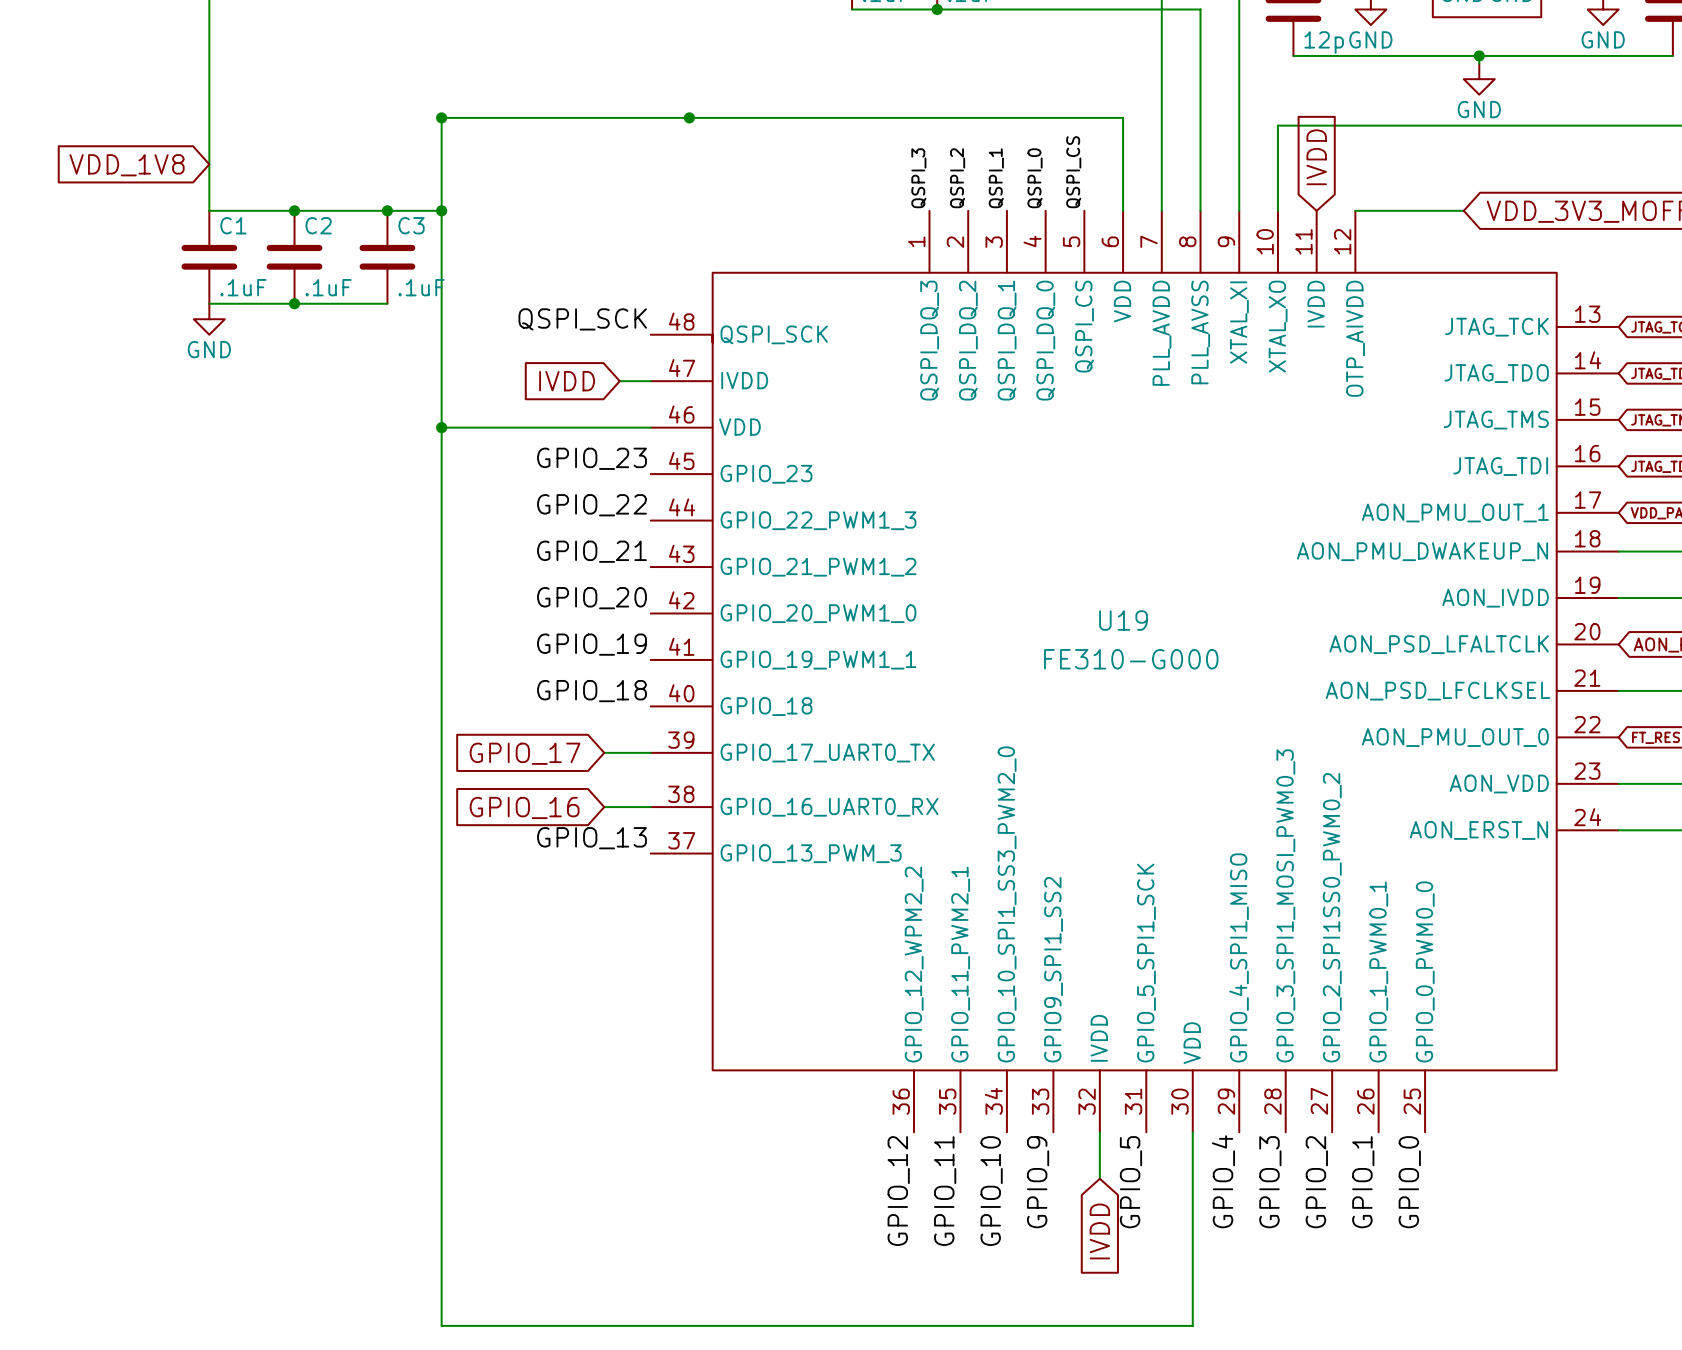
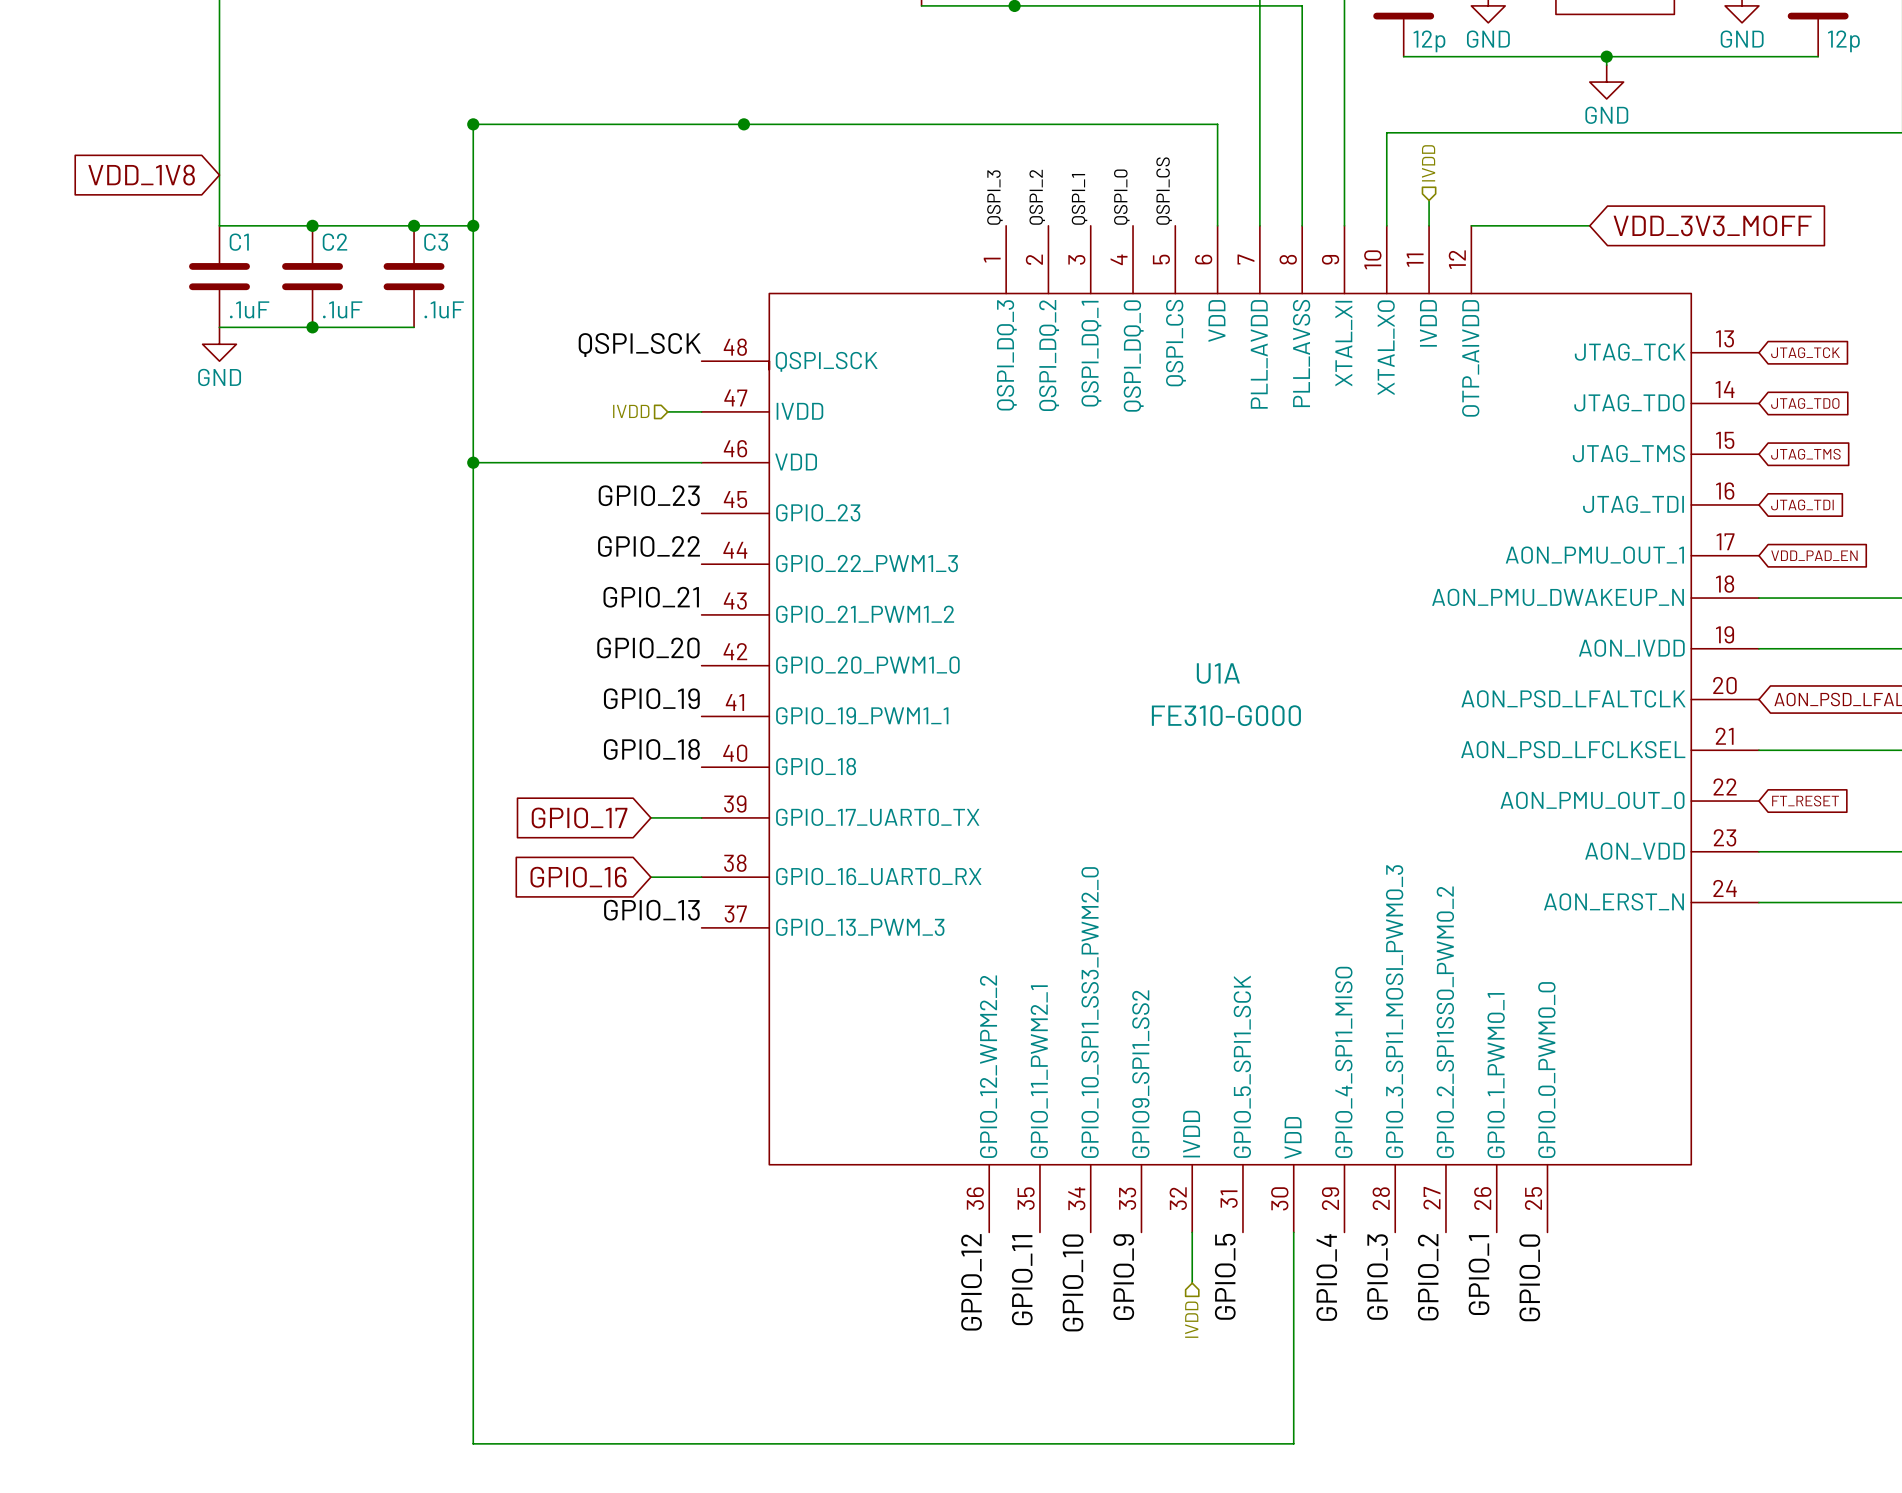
hierarchical label: none -> IVDD (1428, 163)
global label: IVDD (1316, 157) -> none
wire: none -> (1429, 200) (1429, 225)
hierarchical label: none -> IVDD (631, 411)
global label: IVDD (567, 381) -> none
U19 name: U19 (1123, 620) -> U1A (1218, 673)
hierarchical label: none -> IVDD (1191, 1319)
global label: IVDD (1099, 1231) -> none

